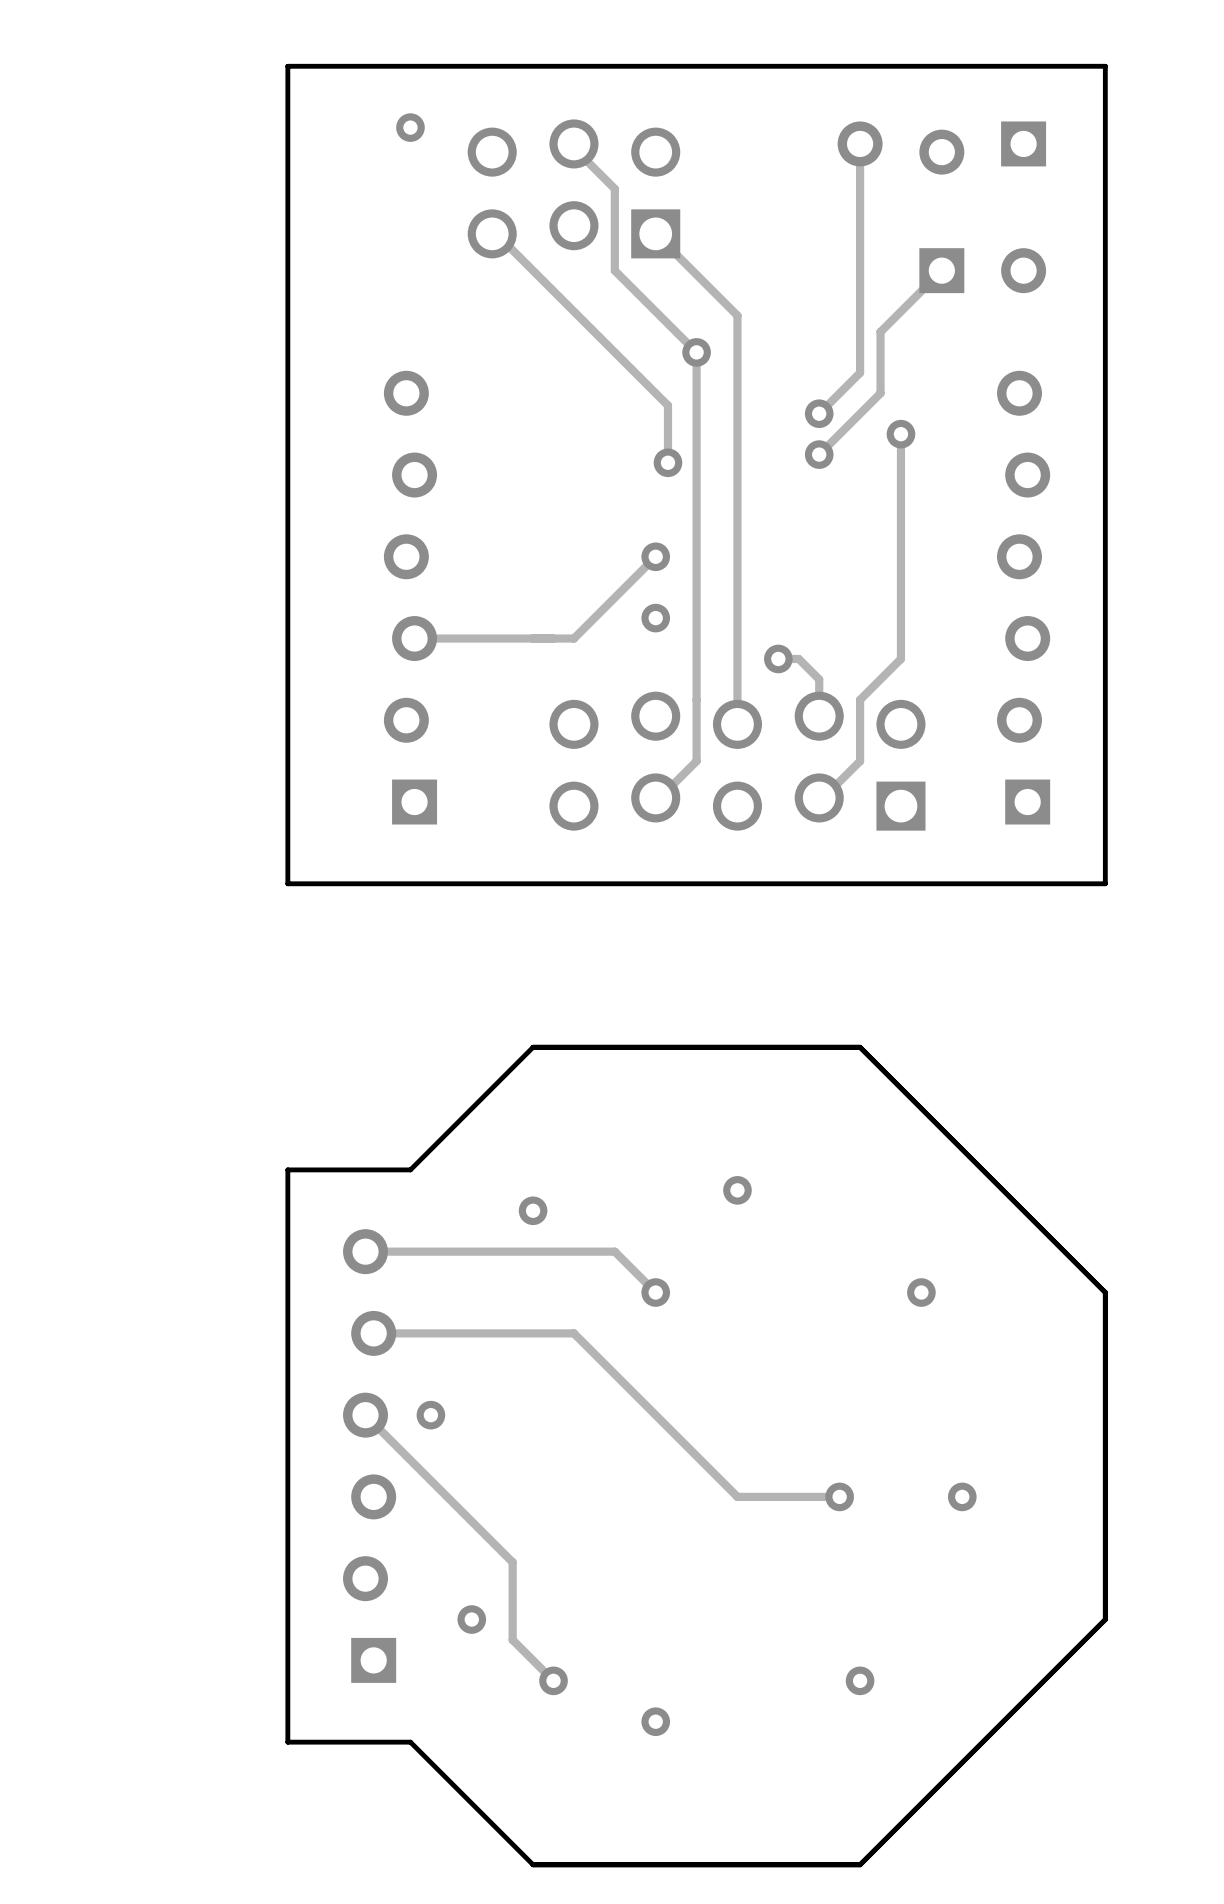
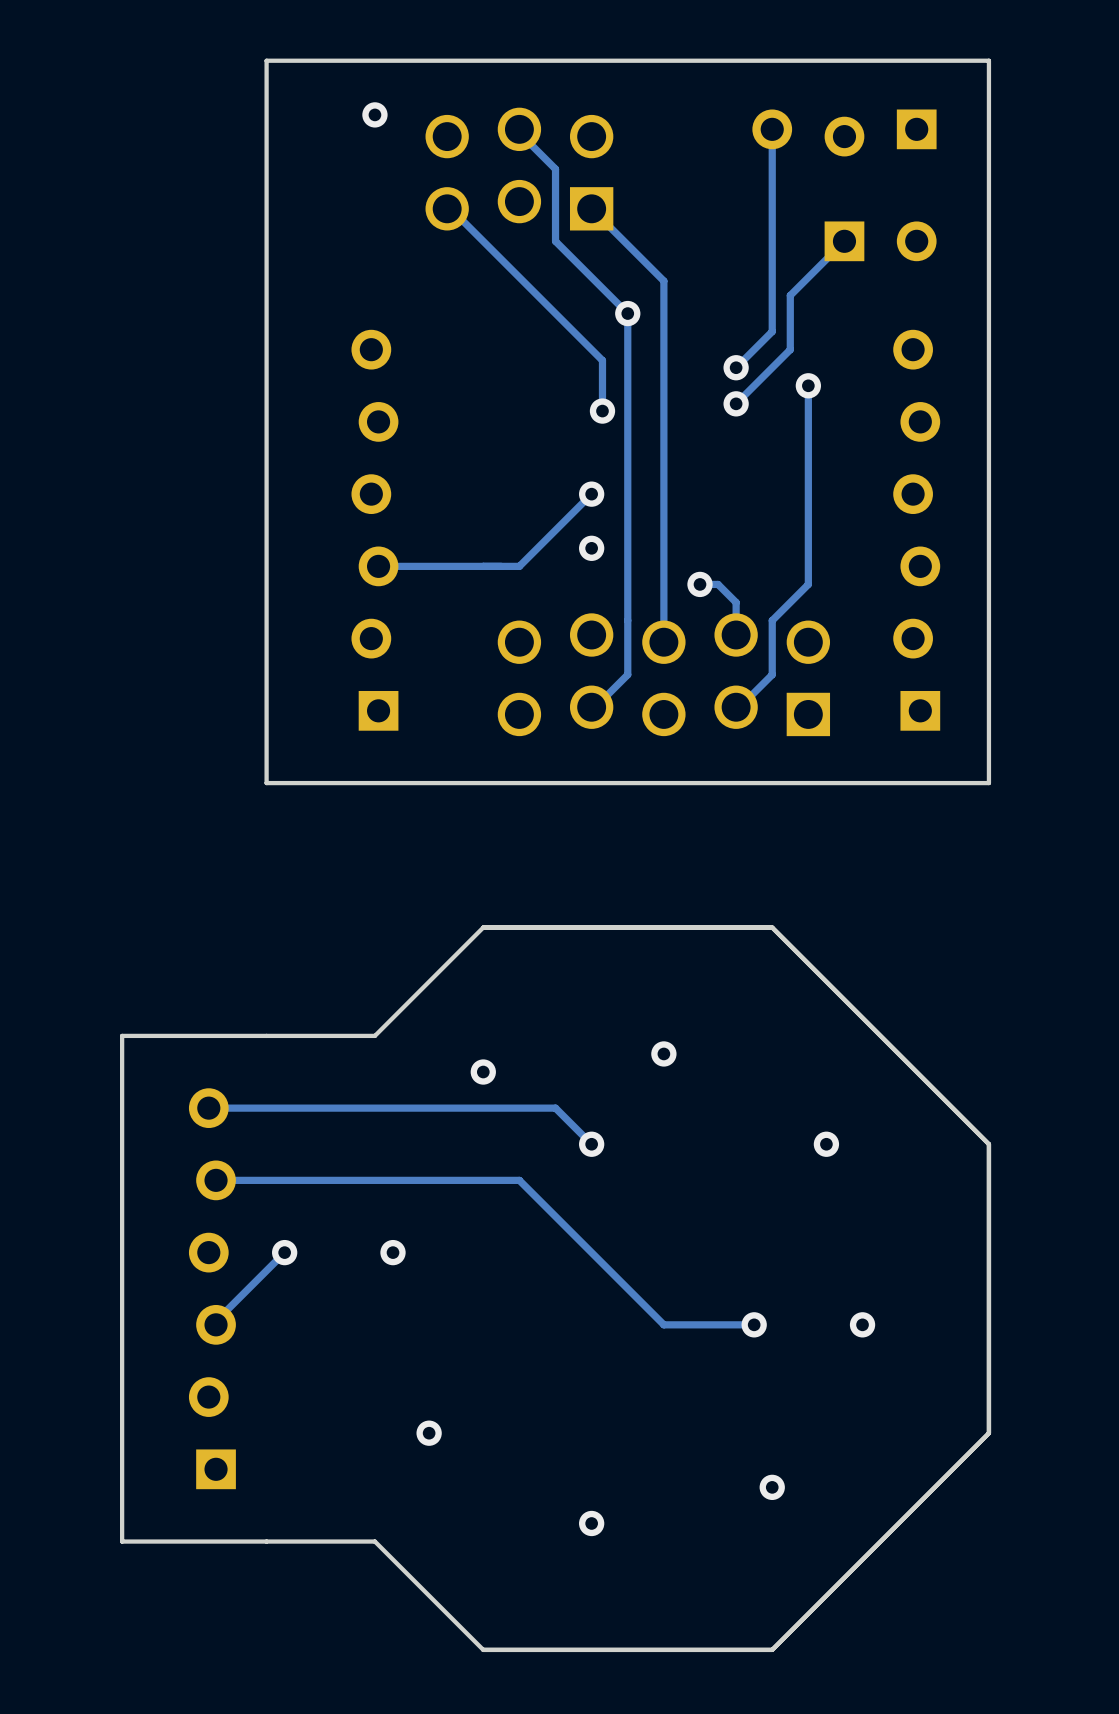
board edge: (287, 1169) (287, 1742) -> (266, 1035) (122, 1035) (122, 1541) (266, 1541)
track: none -> (335, 1108) (208, 1108)
track: none -> (342, 1180) (216, 1180)
track: none -> (284, 1252) (216, 1321) (216, 1324)
via: none -> (284, 1252)
track: (365, 1415) (512, 1562) (512, 1639) (553, 1680) -> none
part position: (369, 1456) -> (212, 1288)
via: (553, 1680) -> none

